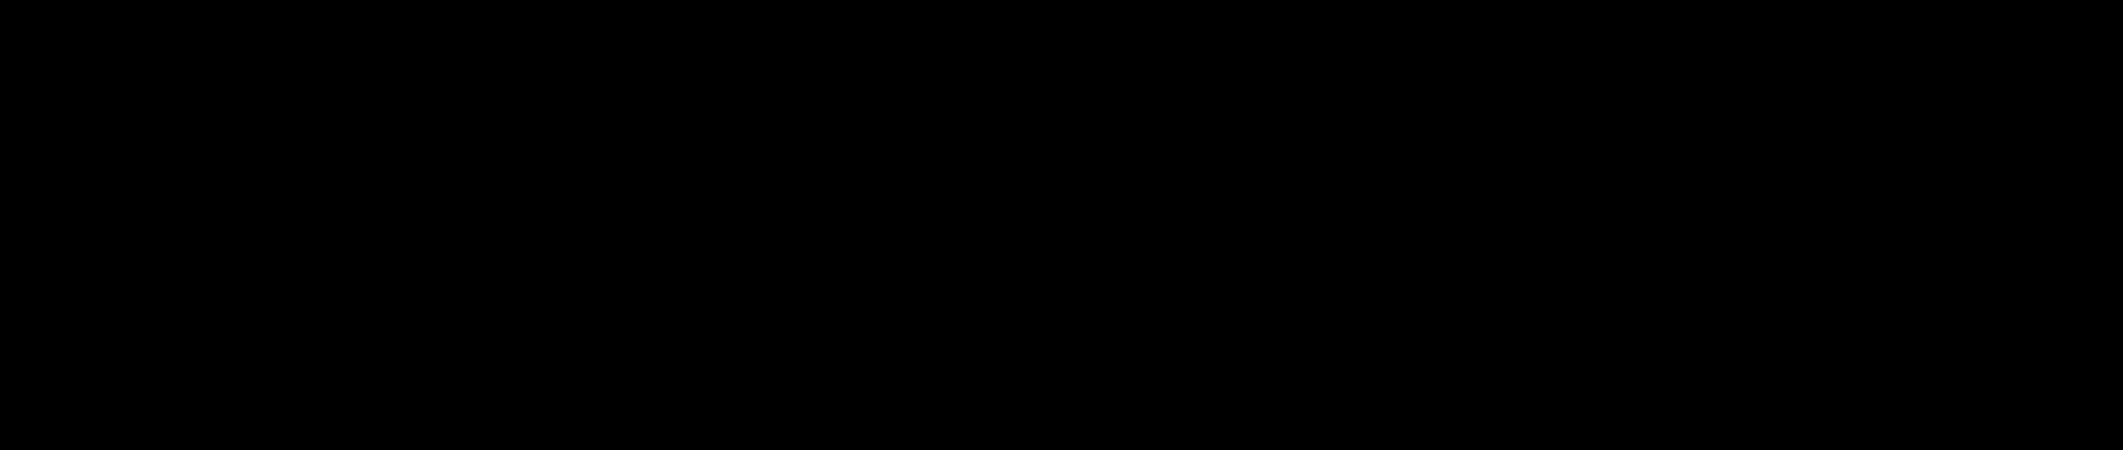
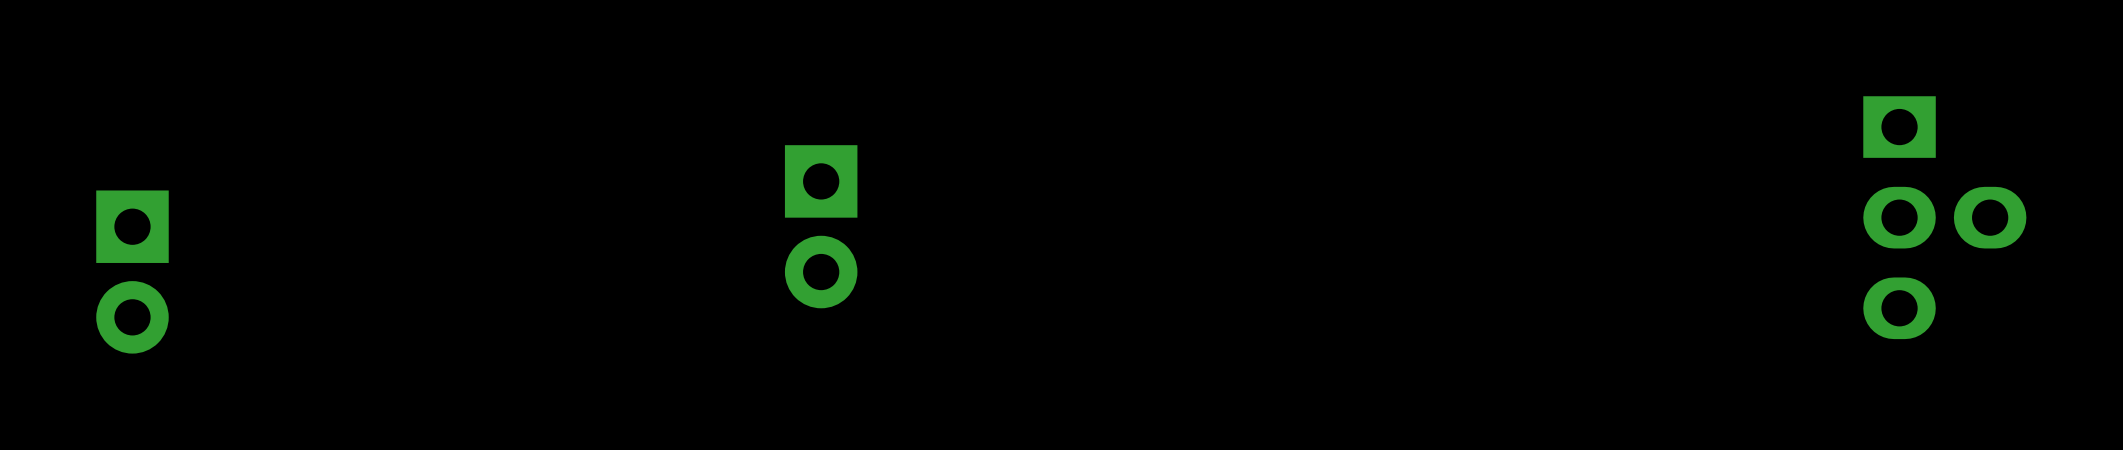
part: none -> (1944, 217)
part: none -> (821, 226)
part: none -> (132, 272)

